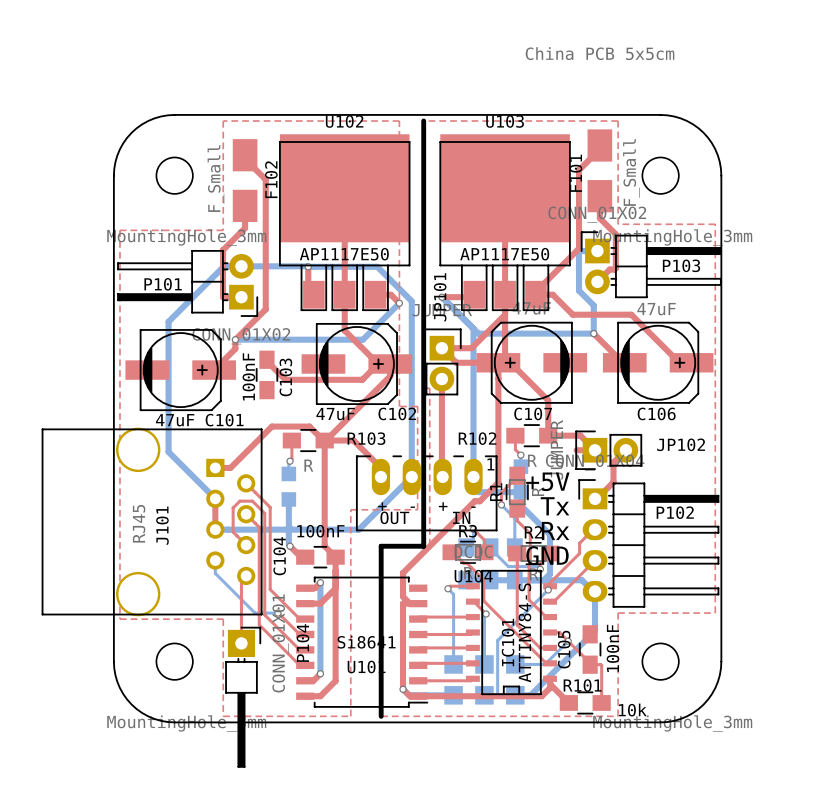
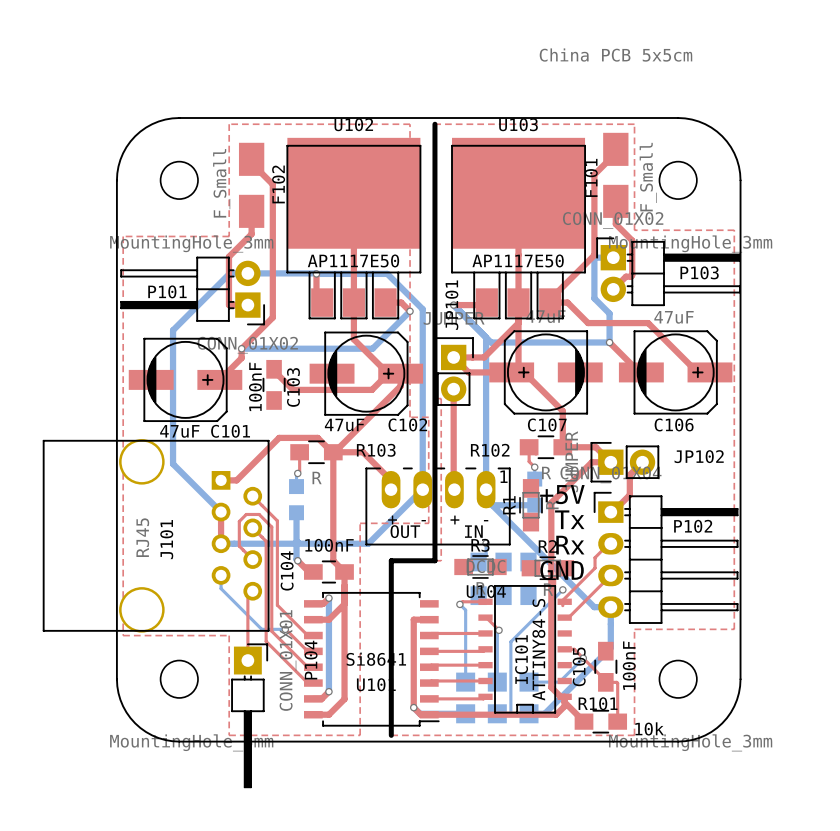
top track: (498, 362) (498, 482) (479, 501) (474, 501) (403, 572) (403, 596) (409, 603) -> none
top track: none -> (591, 462) (551, 502) (551, 687) (560, 696)
top track: (517, 475) (501, 492) (501, 504) -> none
bottom track: (520, 492) (520, 505) (550, 534) (550, 573) (543, 580) -> none
bottom track: (501, 504) (514, 518) (514, 547) -> none
via: (501, 504) -> none
top track: (517, 508) (517, 520) (530, 533) (529, 599) (546, 617) (550, 617) -> none
top track: (473, 529) (484, 540) (484, 552) -> none
bottom track: (490, 547) (508, 566) (537, 566) (540, 569) -> none
top track: (451, 552) (463, 563) (467, 563) (483, 579) (483, 600) (546, 663) (550, 663) -> none
top track: (517, 553) (517, 625) (540, 647) (550, 647) -> none
via: (540, 569) -> none
via: none -> (562, 589)
bottom track: (466, 580) (581, 580) (593, 591) -> (492, 505) (594, 607) (608, 607)
bottom track: (548, 589) (497, 640) -> (562, 589) (510, 641) (510, 657)
via: (548, 589) -> none

